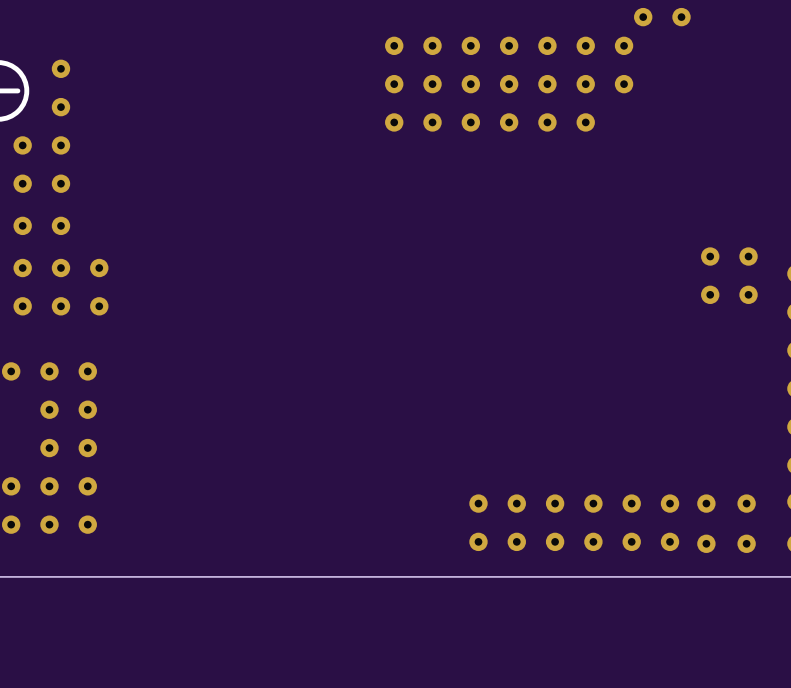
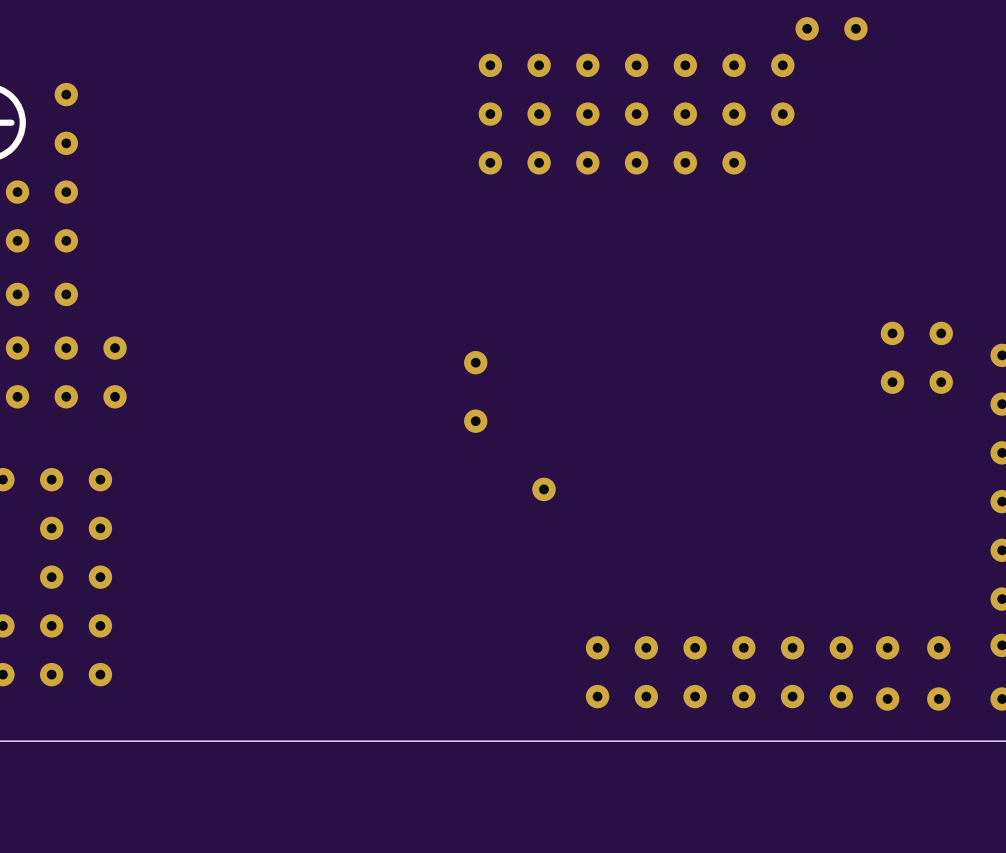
via: none -> (475, 362)
via: none -> (475, 421)
via: none -> (543, 489)

